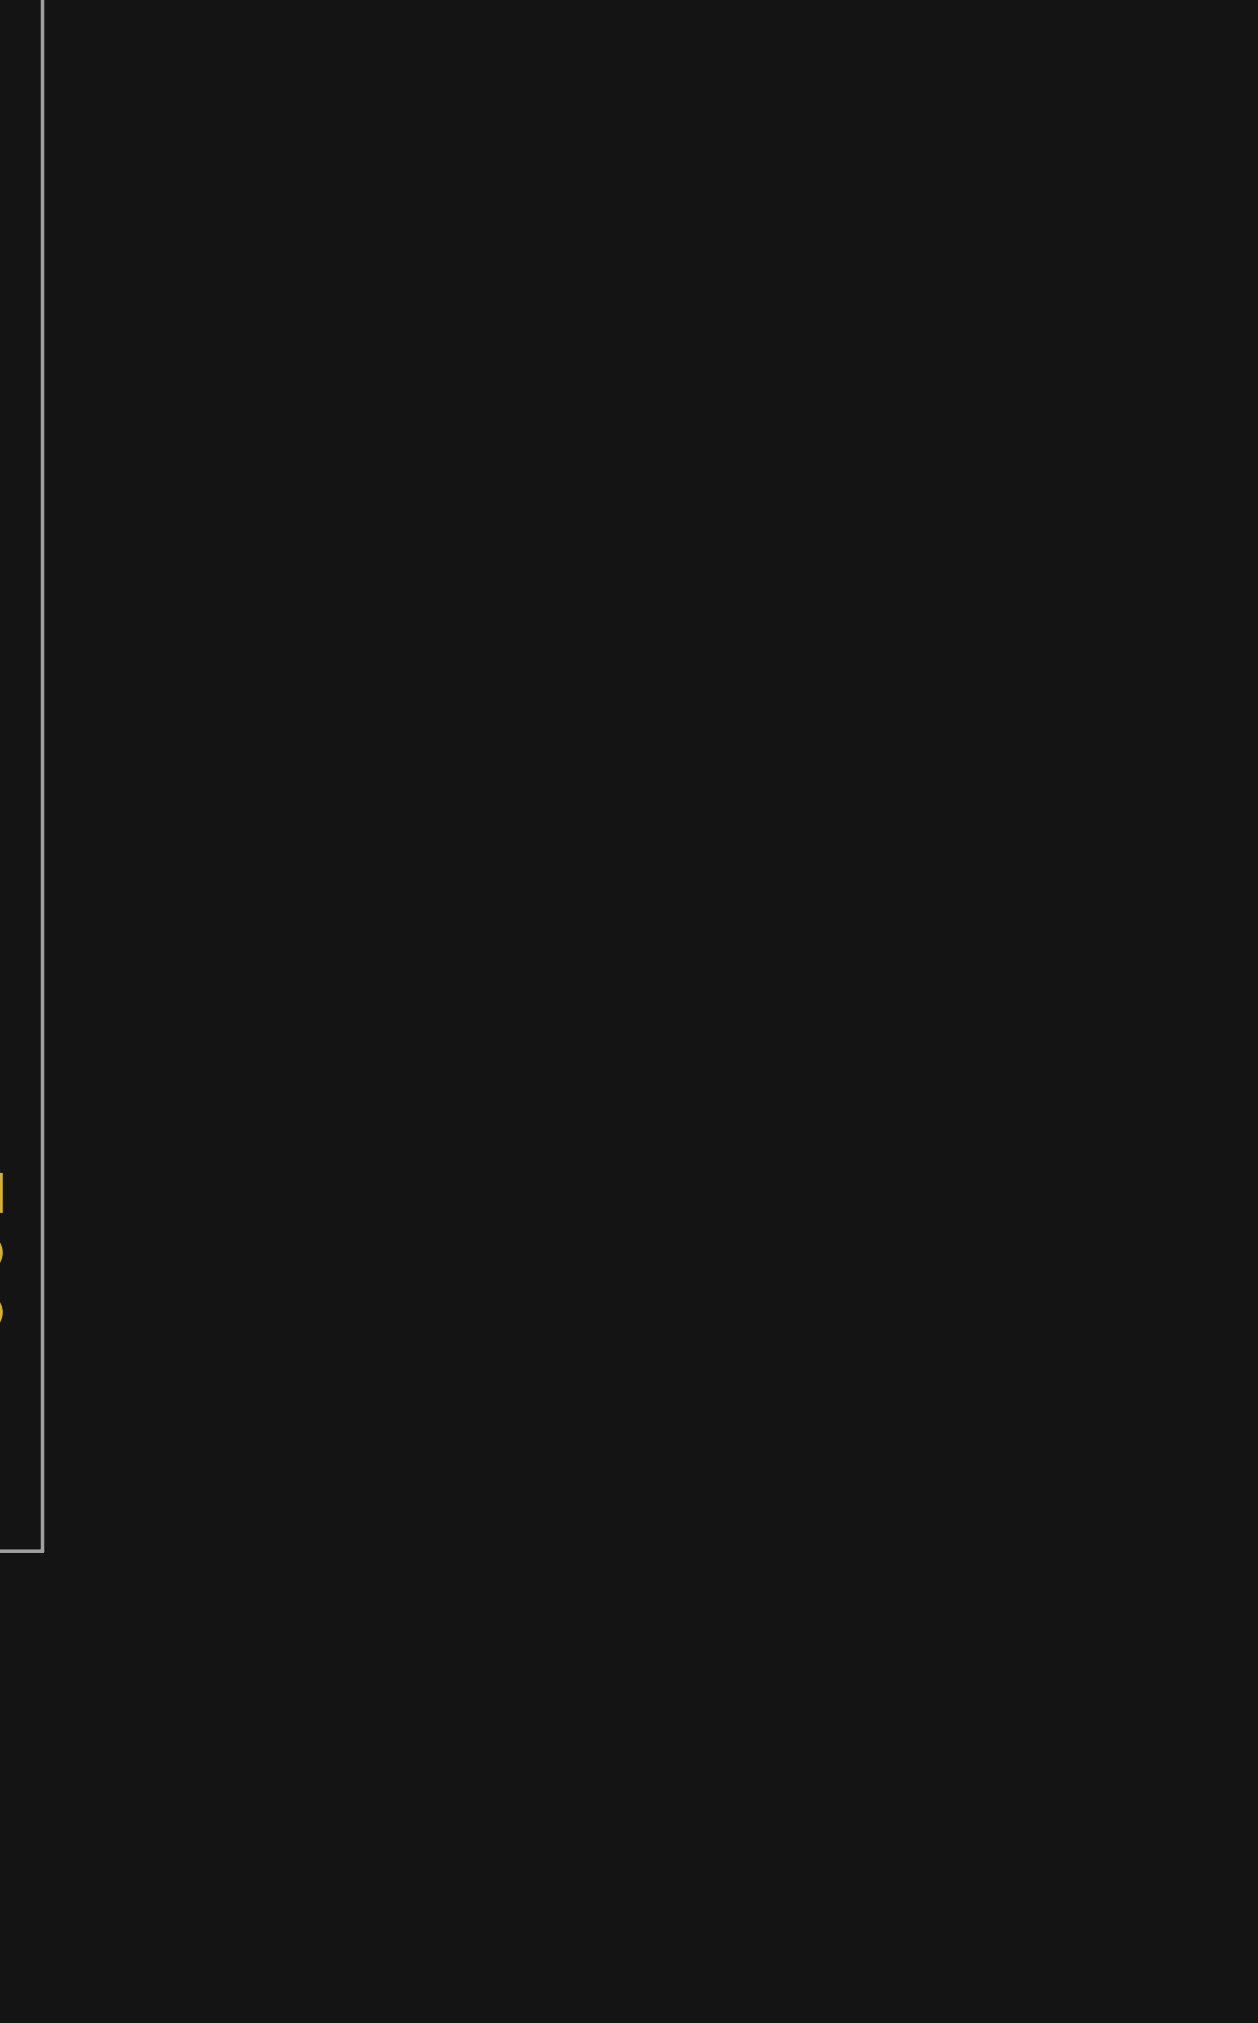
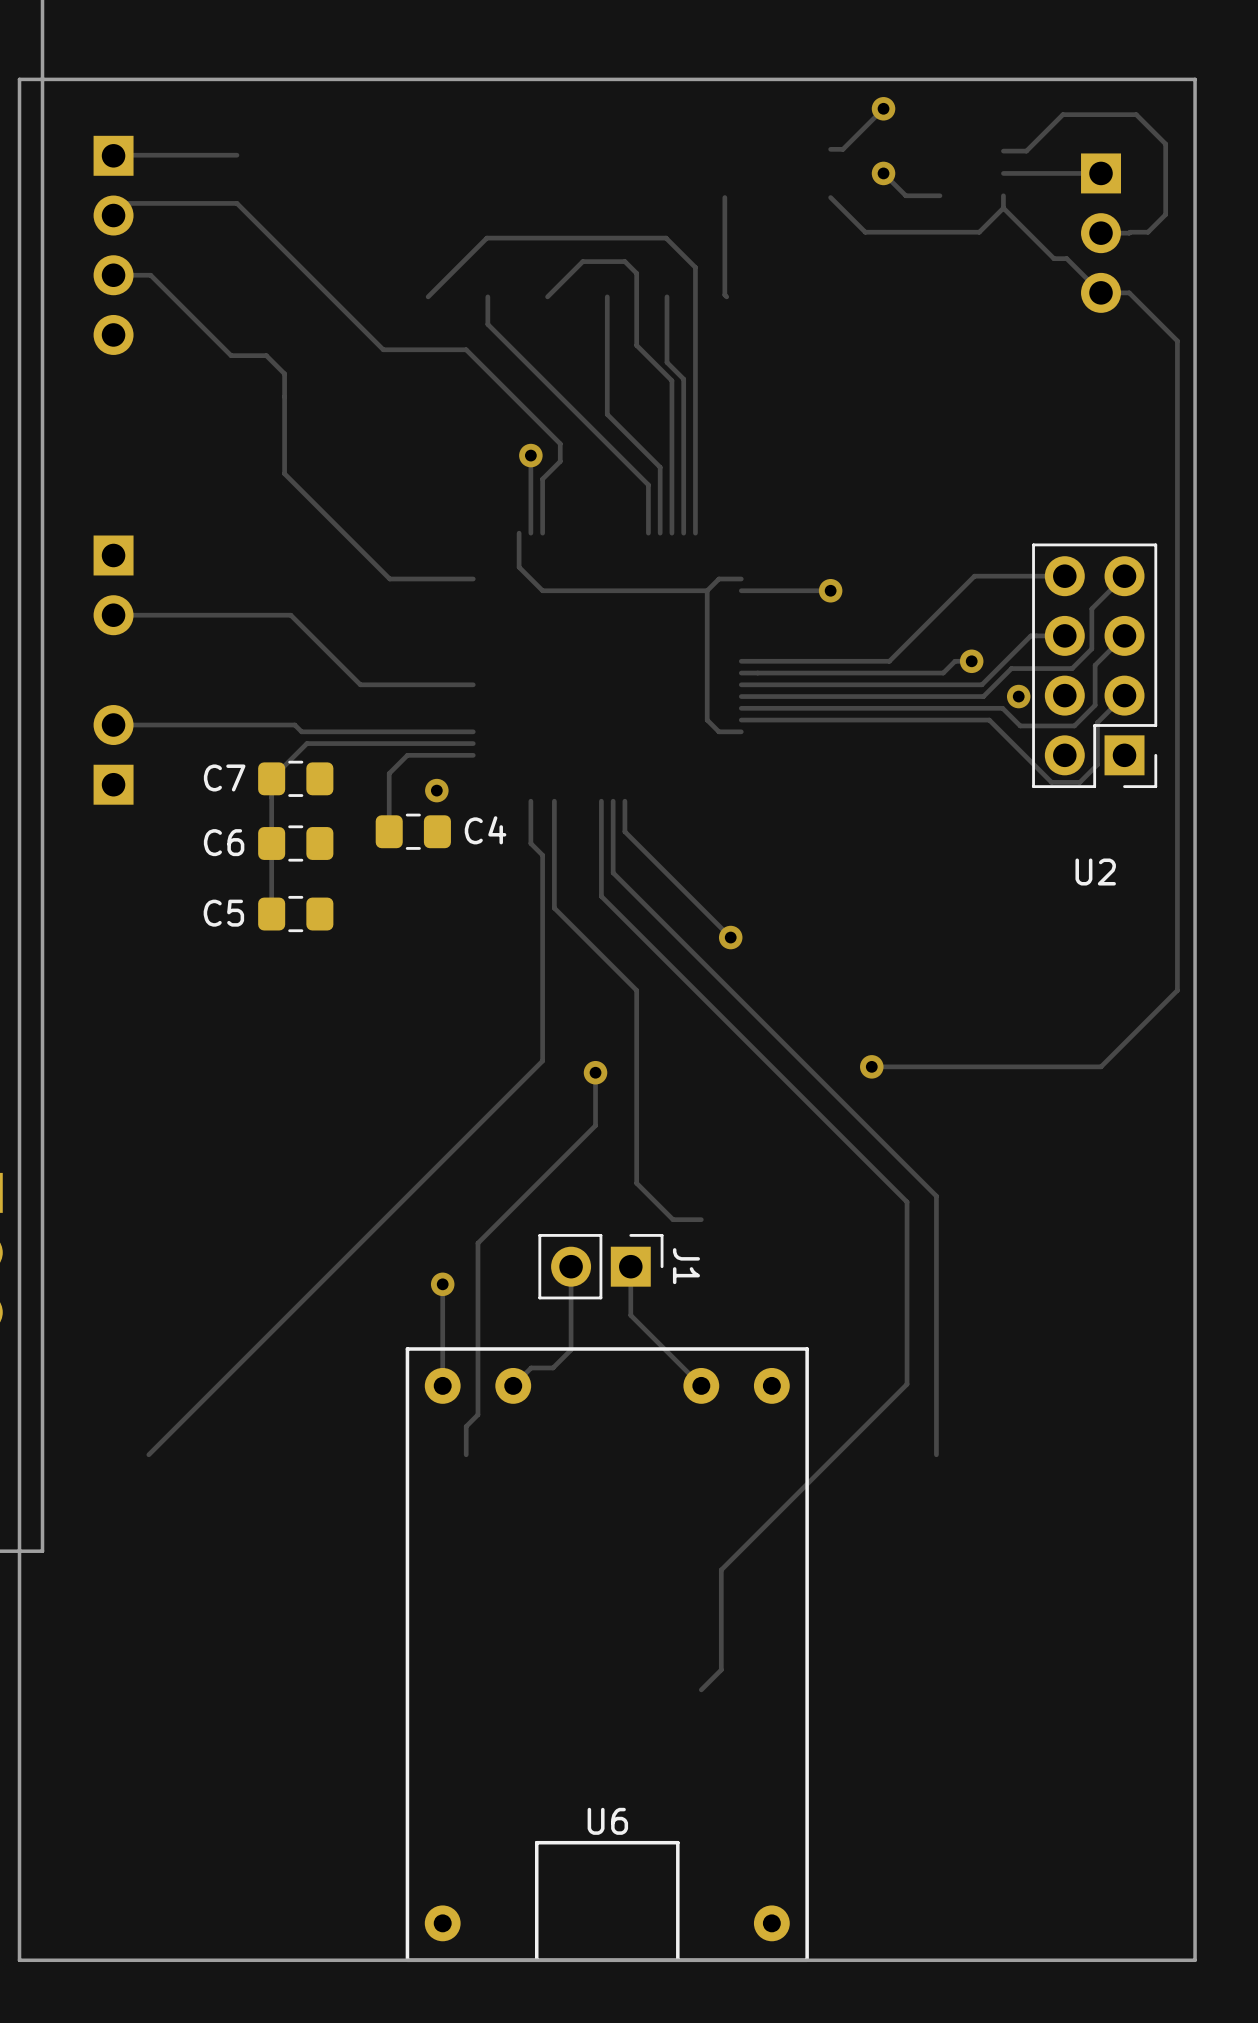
board edge: none -> (1195, 79) (1195, 1960) (19, 1960) (19, 79) (1195, 79)
track: none -> (883, 108) (842, 149) (830, 149)
via: none -> (883, 108)
track: none -> (1003, 151) (1026, 151) (1062, 114) (1136, 114) (1165, 144) (1165, 214) (1148, 232) (1101, 233)
track: none -> (236, 155) (113, 155)
track: none -> (883, 173) (905, 195) (939, 195)
via: none -> (883, 173)
track: none -> (1101, 173) (1003, 173)
track: none -> (1003, 195) (1003, 208)
track: none -> (724, 197) (724, 294) (726, 296)
track: none -> (830, 197) (865, 232) (979, 232) (1003, 208)
track: none -> (1003, 208) (1053, 258) (1066, 258) (1101, 292) (1129, 292) (1177, 341) (1177, 990) (1101, 1066) (871, 1066)
track: none -> (113, 215) (125, 203) (236, 203) (383, 349) (466, 349) (560, 443) (560, 461) (542, 479) (542, 533)
part: none -> (1101, 233)
part: none -> (113, 245)
track: none -> (113, 275) (150, 275) (231, 355) (266, 355) (284, 373) (284, 473) (389, 579) (473, 579)
track: none -> (428, 296) (486, 238) (666, 238) (695, 267) (695, 533)
track: none -> (487, 296) (487, 324) (648, 484) (648, 533)
track: none -> (547, 296) (582, 261) (624, 261) (636, 273) (636, 345) (671, 380) (671, 533)
track: none -> (607, 296) (607, 414) (660, 467) (660, 533)
track: none -> (667, 296) (667, 362) (683, 379) (683, 533)
track: none -> (530, 455) (530, 533)
via: none -> (530, 455)
track: none -> (519, 533) (519, 567) (542, 590) (707, 590)
track: none -> (1064, 576) (974, 576) (889, 661) (741, 661)
track: none -> (1124, 576) (1091, 608) (1091, 648) (1072, 668) (1011, 668) (983, 696) (741, 696)
track: none -> (741, 579) (718, 579) (707, 590)
part: none -> (113, 585)
track: none -> (707, 590) (707, 720) (718, 731) (741, 731)
track: none -> (830, 590) (741, 590)
via: none -> (830, 590)
track: none -> (113, 615) (290, 615) (360, 684) (473, 684)
track: none -> (1064, 635) (1030, 635) (981, 684) (741, 684)
track: none -> (1124, 635) (1095, 665) (1095, 705) (1074, 725) (1020, 725) (1002, 708) (741, 708)
track: none -> (971, 661) (955, 661) (943, 673) (741, 673)
via: none -> (971, 661)
U2: none -> (1094, 665)
track: none -> (1124, 695) (1097, 722) (1097, 764) (1079, 782) (1051, 782) (989, 720) (741, 720)
via: none -> (1018, 696)
track: none -> (113, 725) (294, 725) (301, 731) (473, 731)
track: none -> (473, 743) (306, 743) (271, 778) (271, 914)
part: none -> (113, 754)
track: none -> (473, 755) (407, 755) (389, 773) (389, 831)
C7: none -> (295, 778)
via: none -> (436, 790)
track: none -> (530, 801) (530, 843) (542, 855) (542, 1060) (148, 1454)
track: none -> (554, 801) (554, 908) (636, 990) (636, 1183) (673, 1219) (701, 1219)
track: none -> (601, 801) (601, 896) (907, 1202) (907, 1384) (721, 1569) (721, 1669) (701, 1689)
track: none -> (613, 801) (613, 872) (936, 1196) (936, 1454)
track: none -> (624, 801) (624, 831) (730, 937)
C4: none -> (413, 831)
C6: none -> (295, 843)
C5: none -> (295, 914)
via: none -> (730, 937)
via: none -> (871, 1066)
track: none -> (595, 1072) (595, 1125) (477, 1243) (477, 1414) (466, 1426) (466, 1454)
via: none -> (595, 1072)
track: none -> (571, 1266) (571, 1349) (553, 1367) (531, 1367) (513, 1385)
J1: none -> (600, 1266)
track: none -> (630, 1266) (630, 1315) (701, 1385)
track: none -> (442, 1284) (442, 1385)
via: none -> (442, 1284)
U6: none -> (607, 1654)

